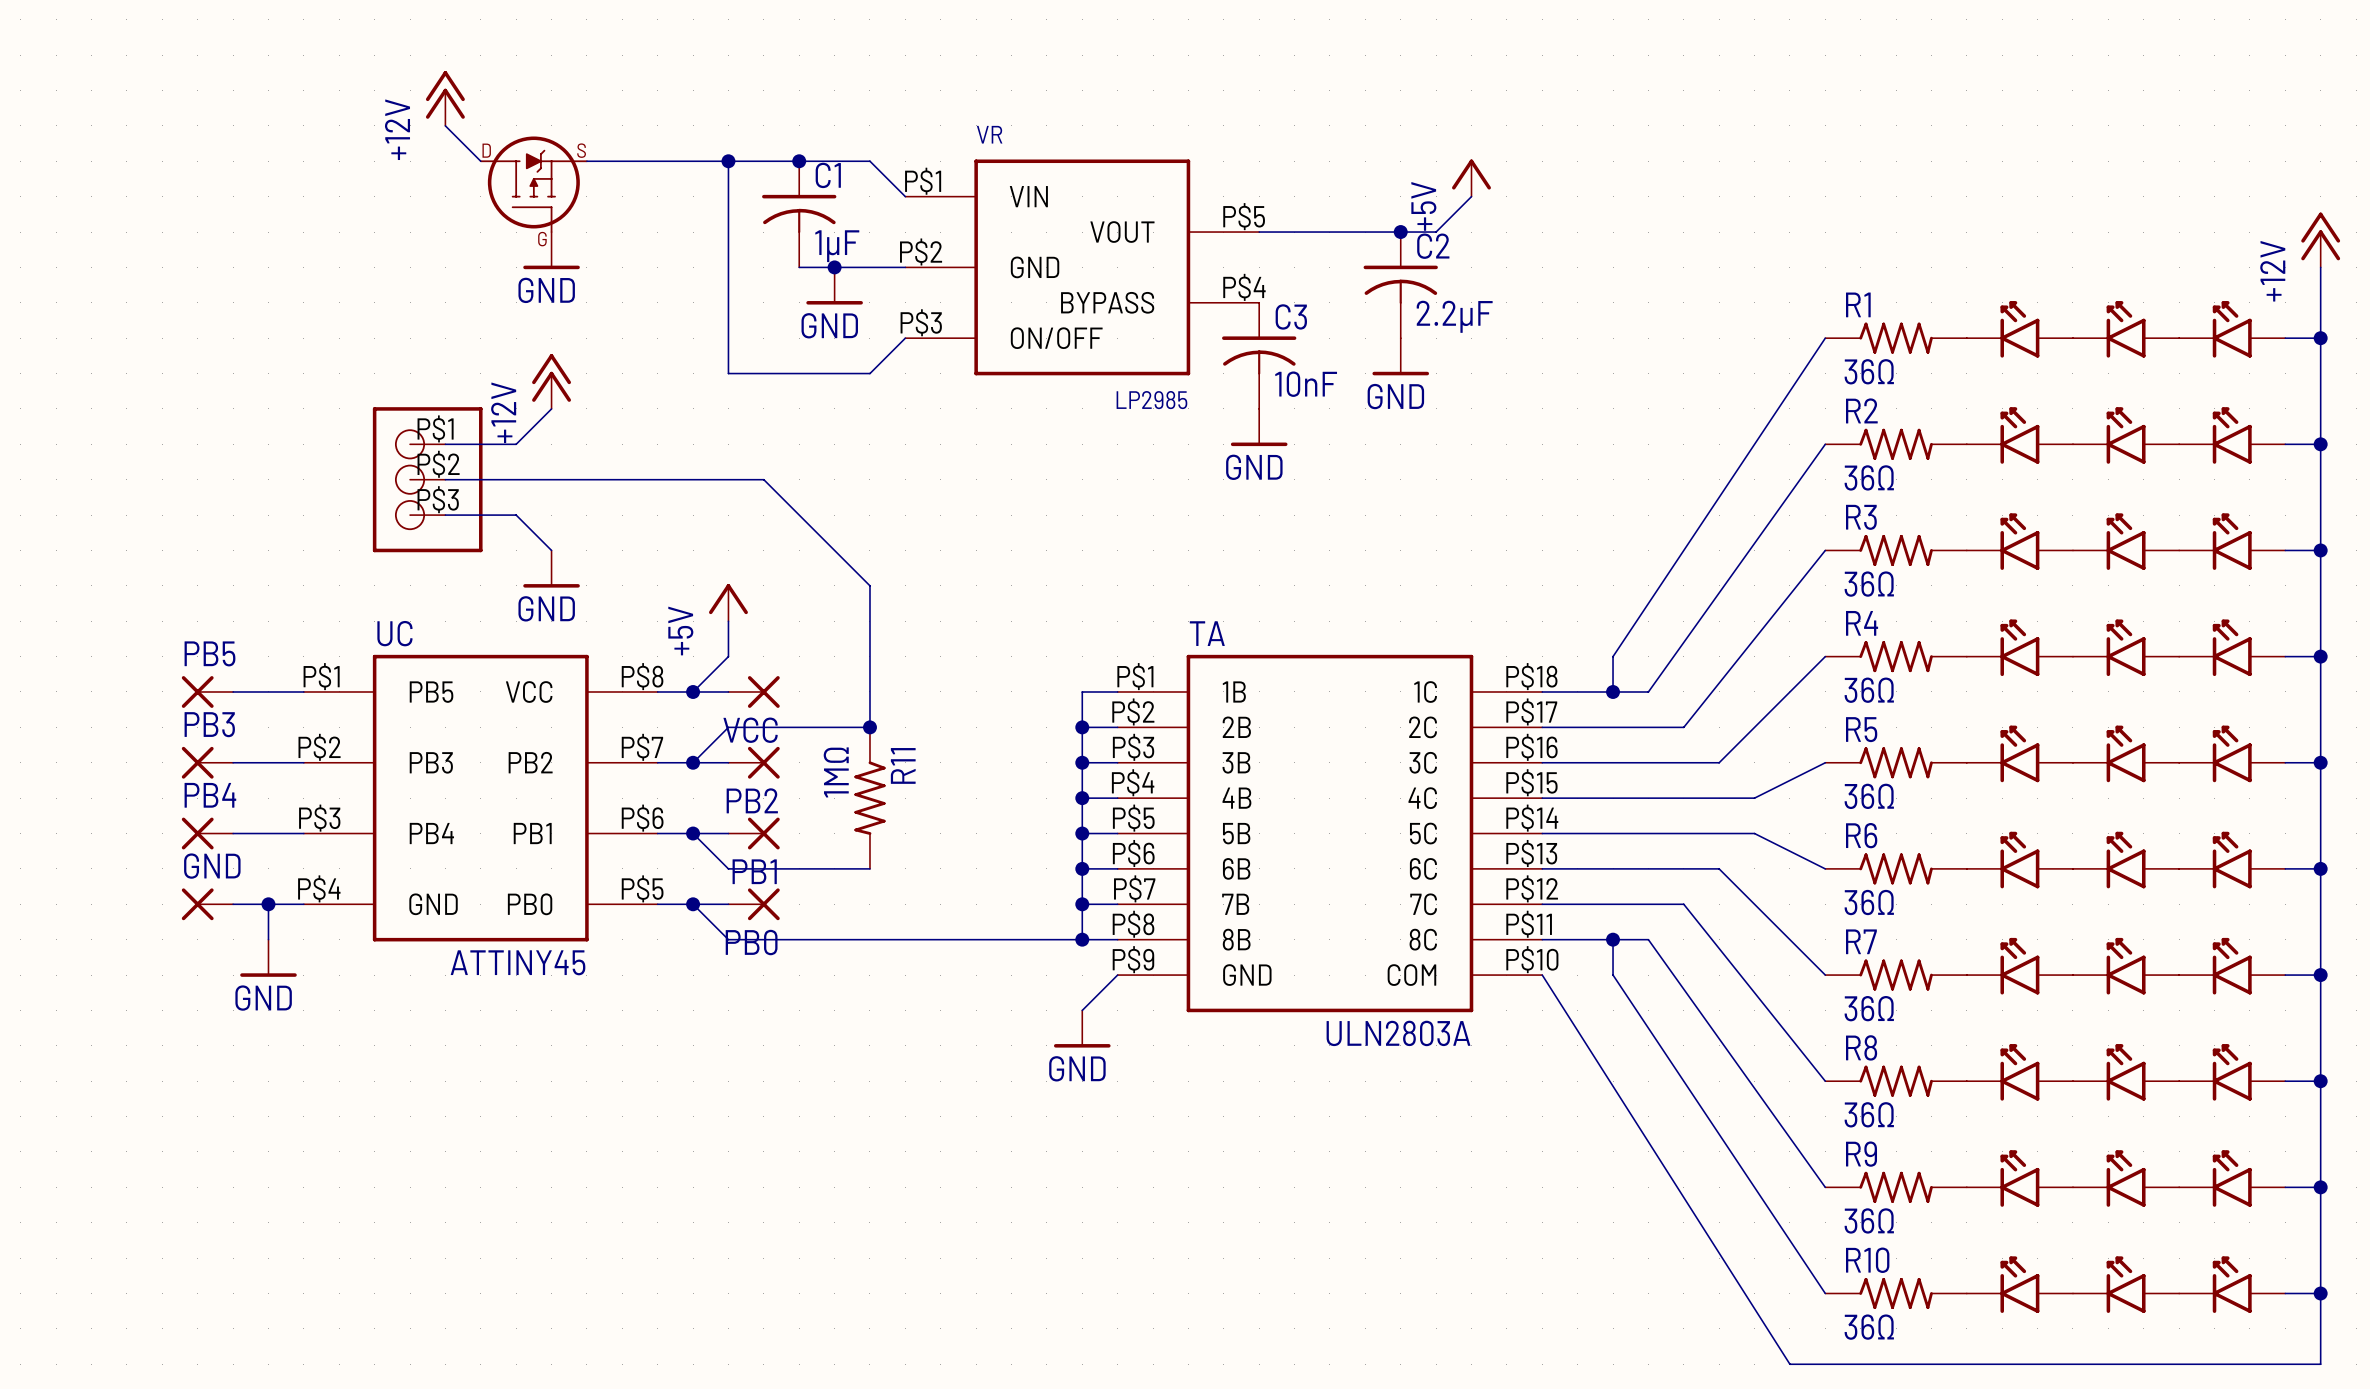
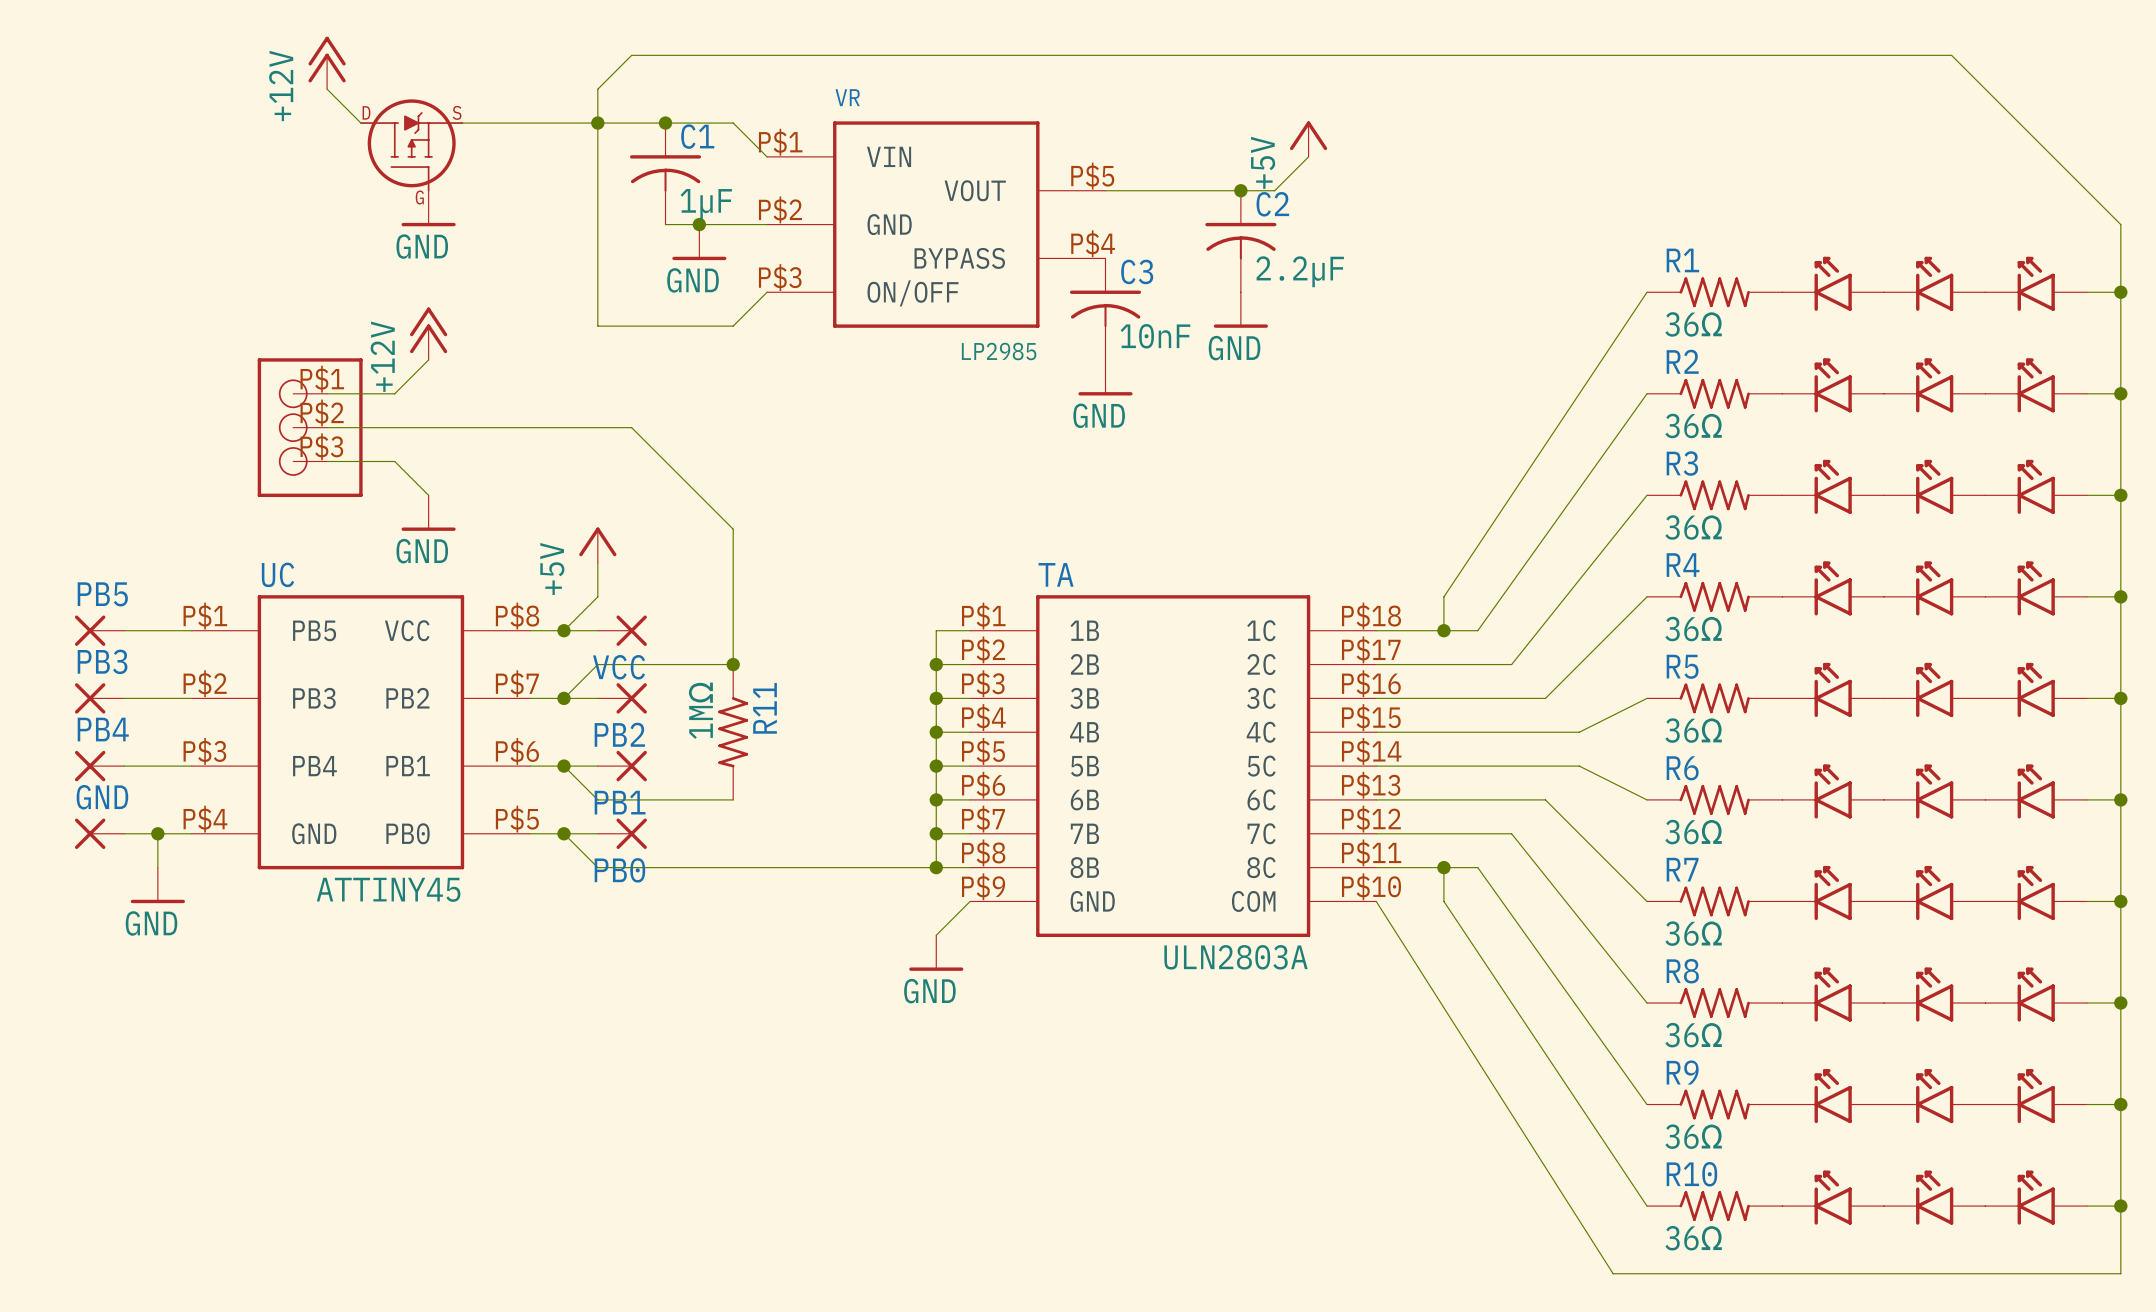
wire: none -> (597, 123) (597, 89) (631, 55) (1951, 55) (2120, 224)
power symbol: +12V (2320, 239) -> none

